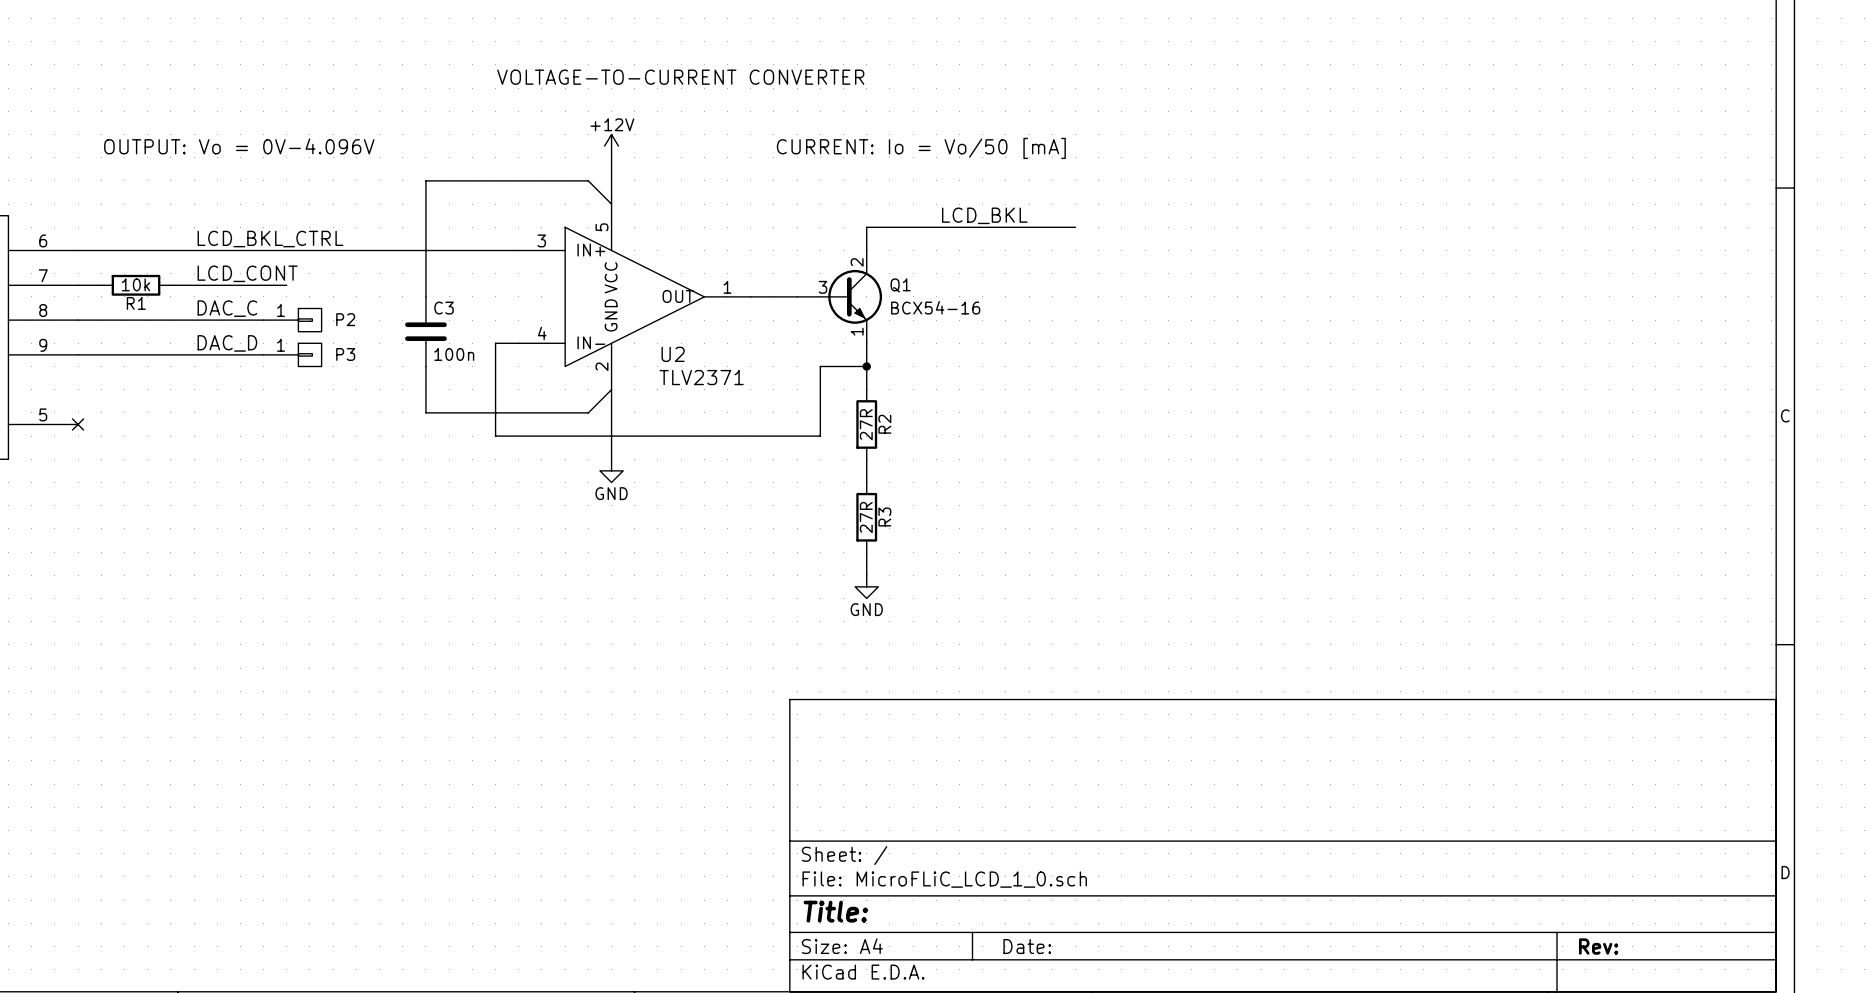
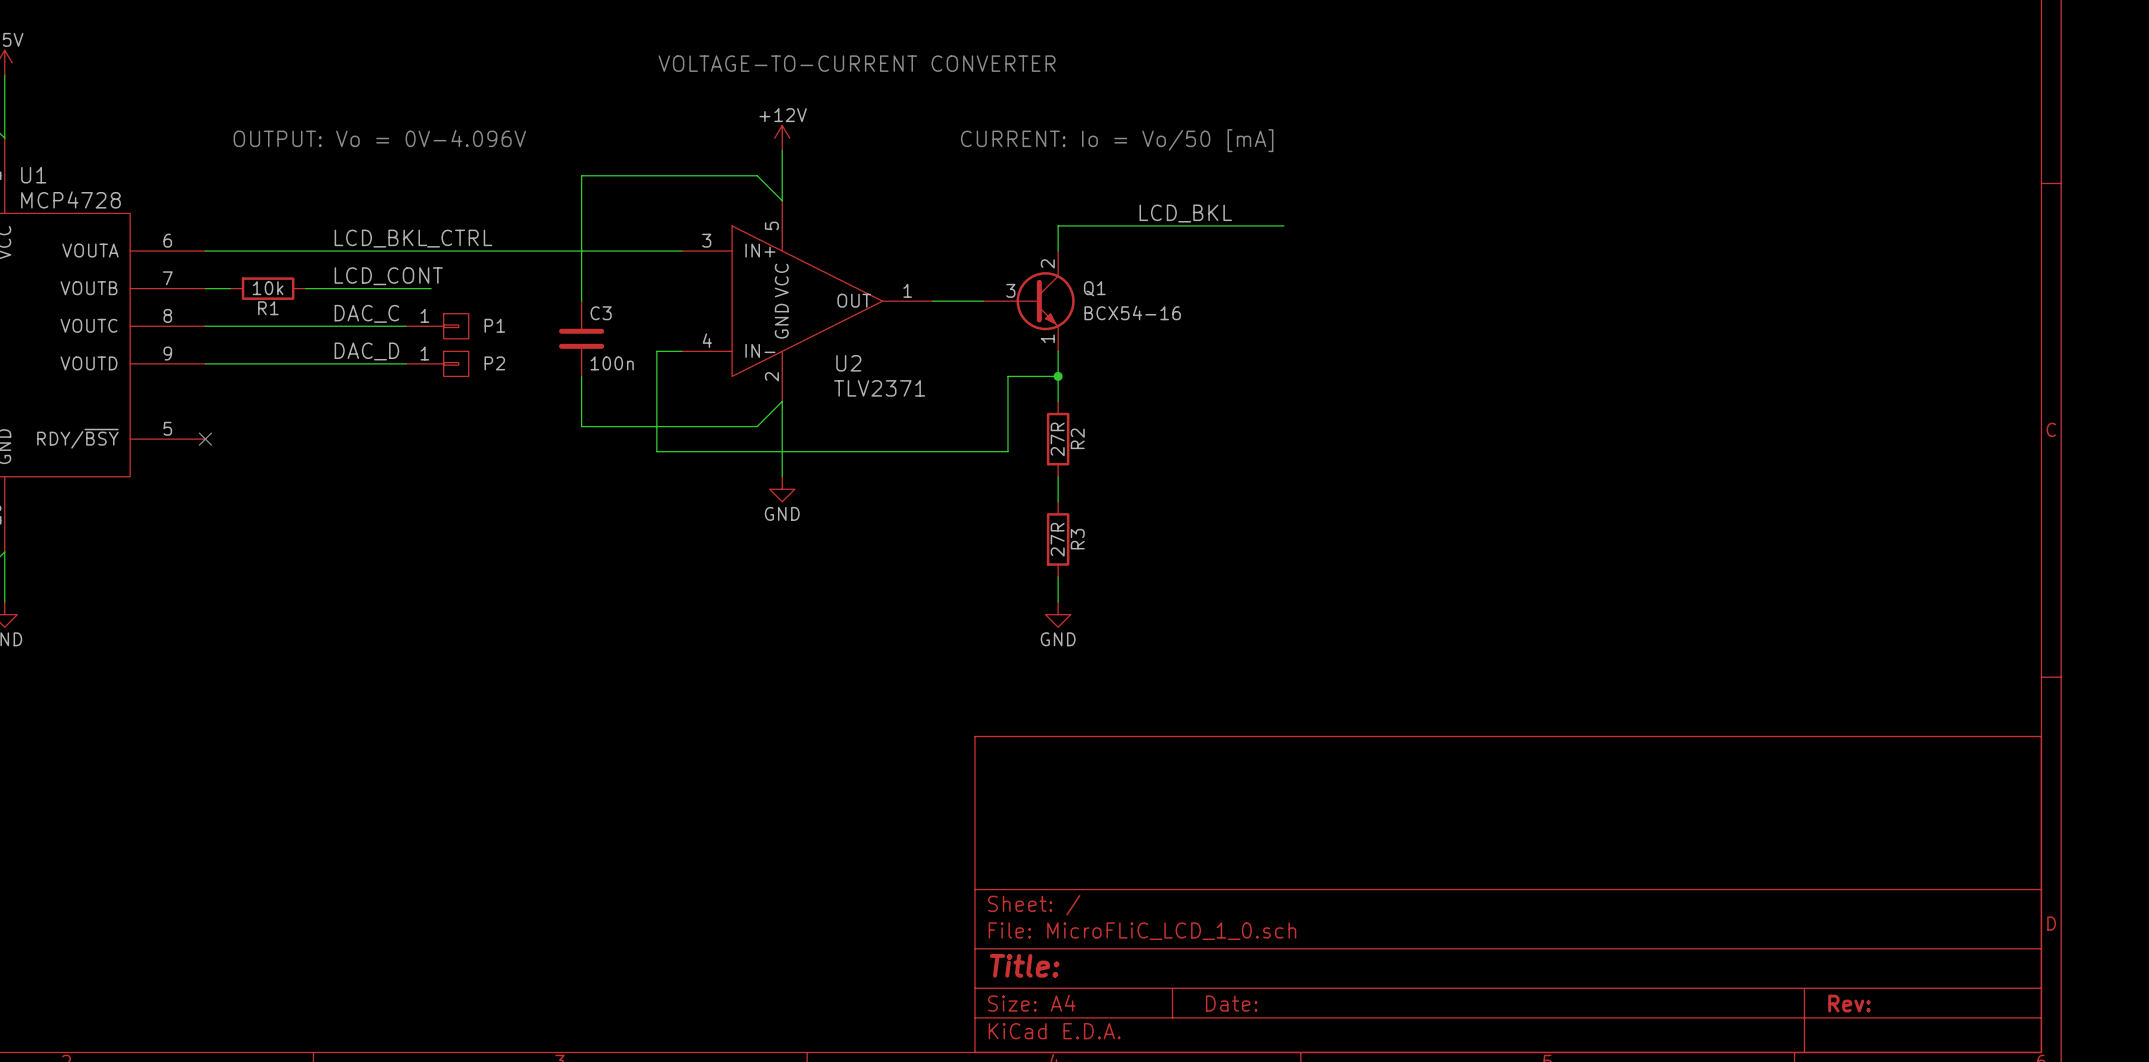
P2 name: P2 (345, 319) -> P1 (494, 325)
P3 name: P3 (345, 354) -> P2 (494, 363)

